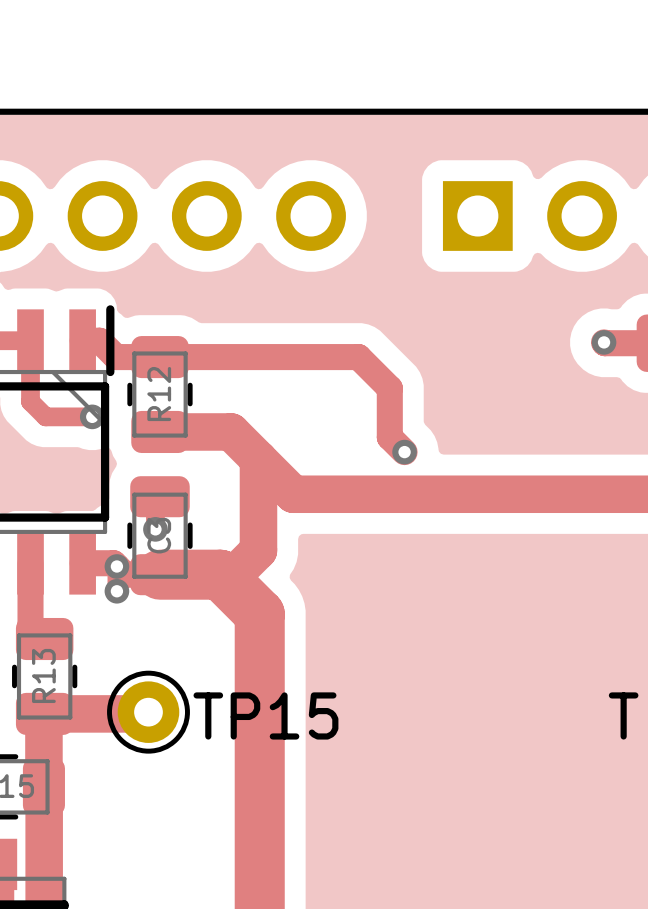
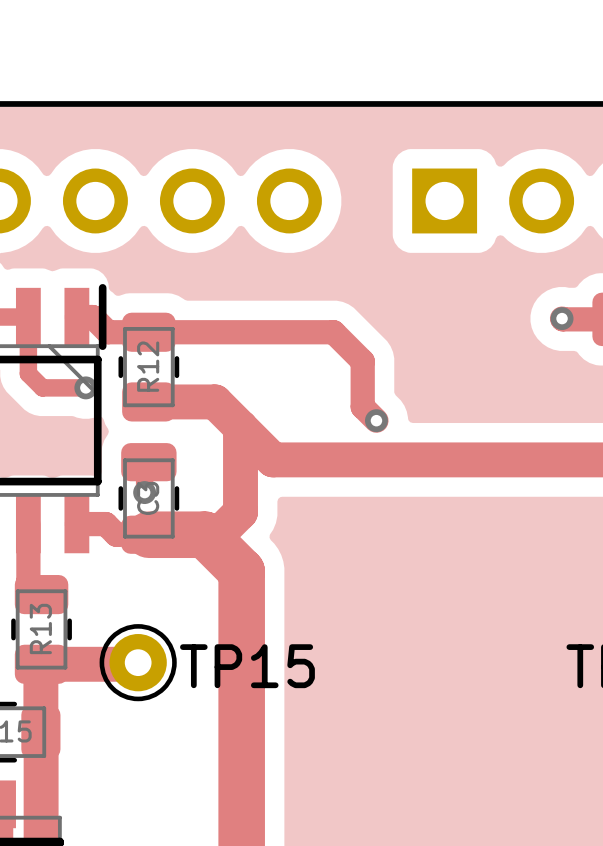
via: (116, 566) -> none
via: (116, 591) -> none

